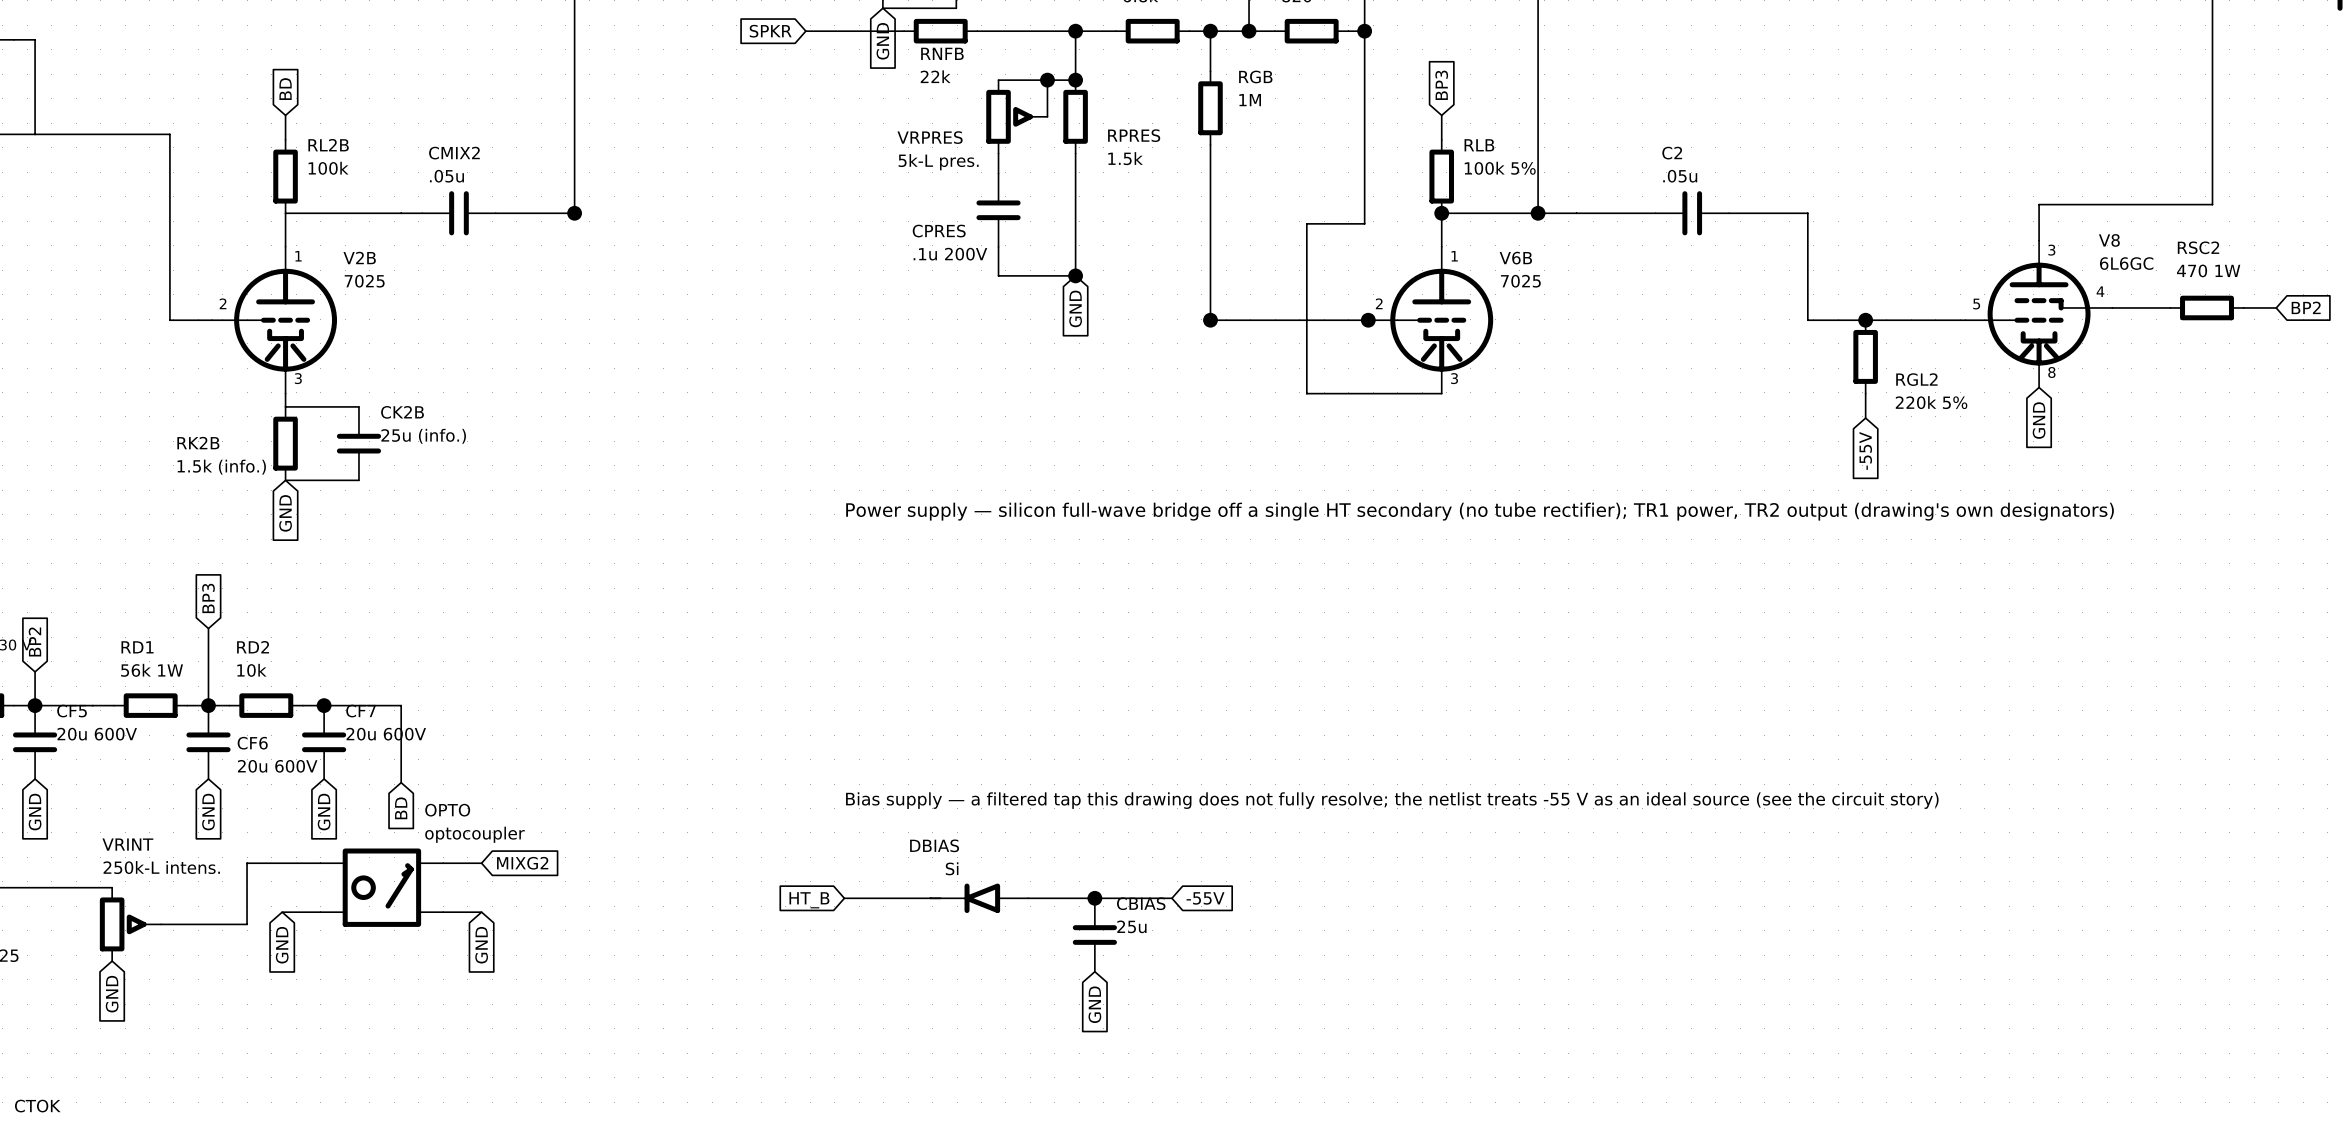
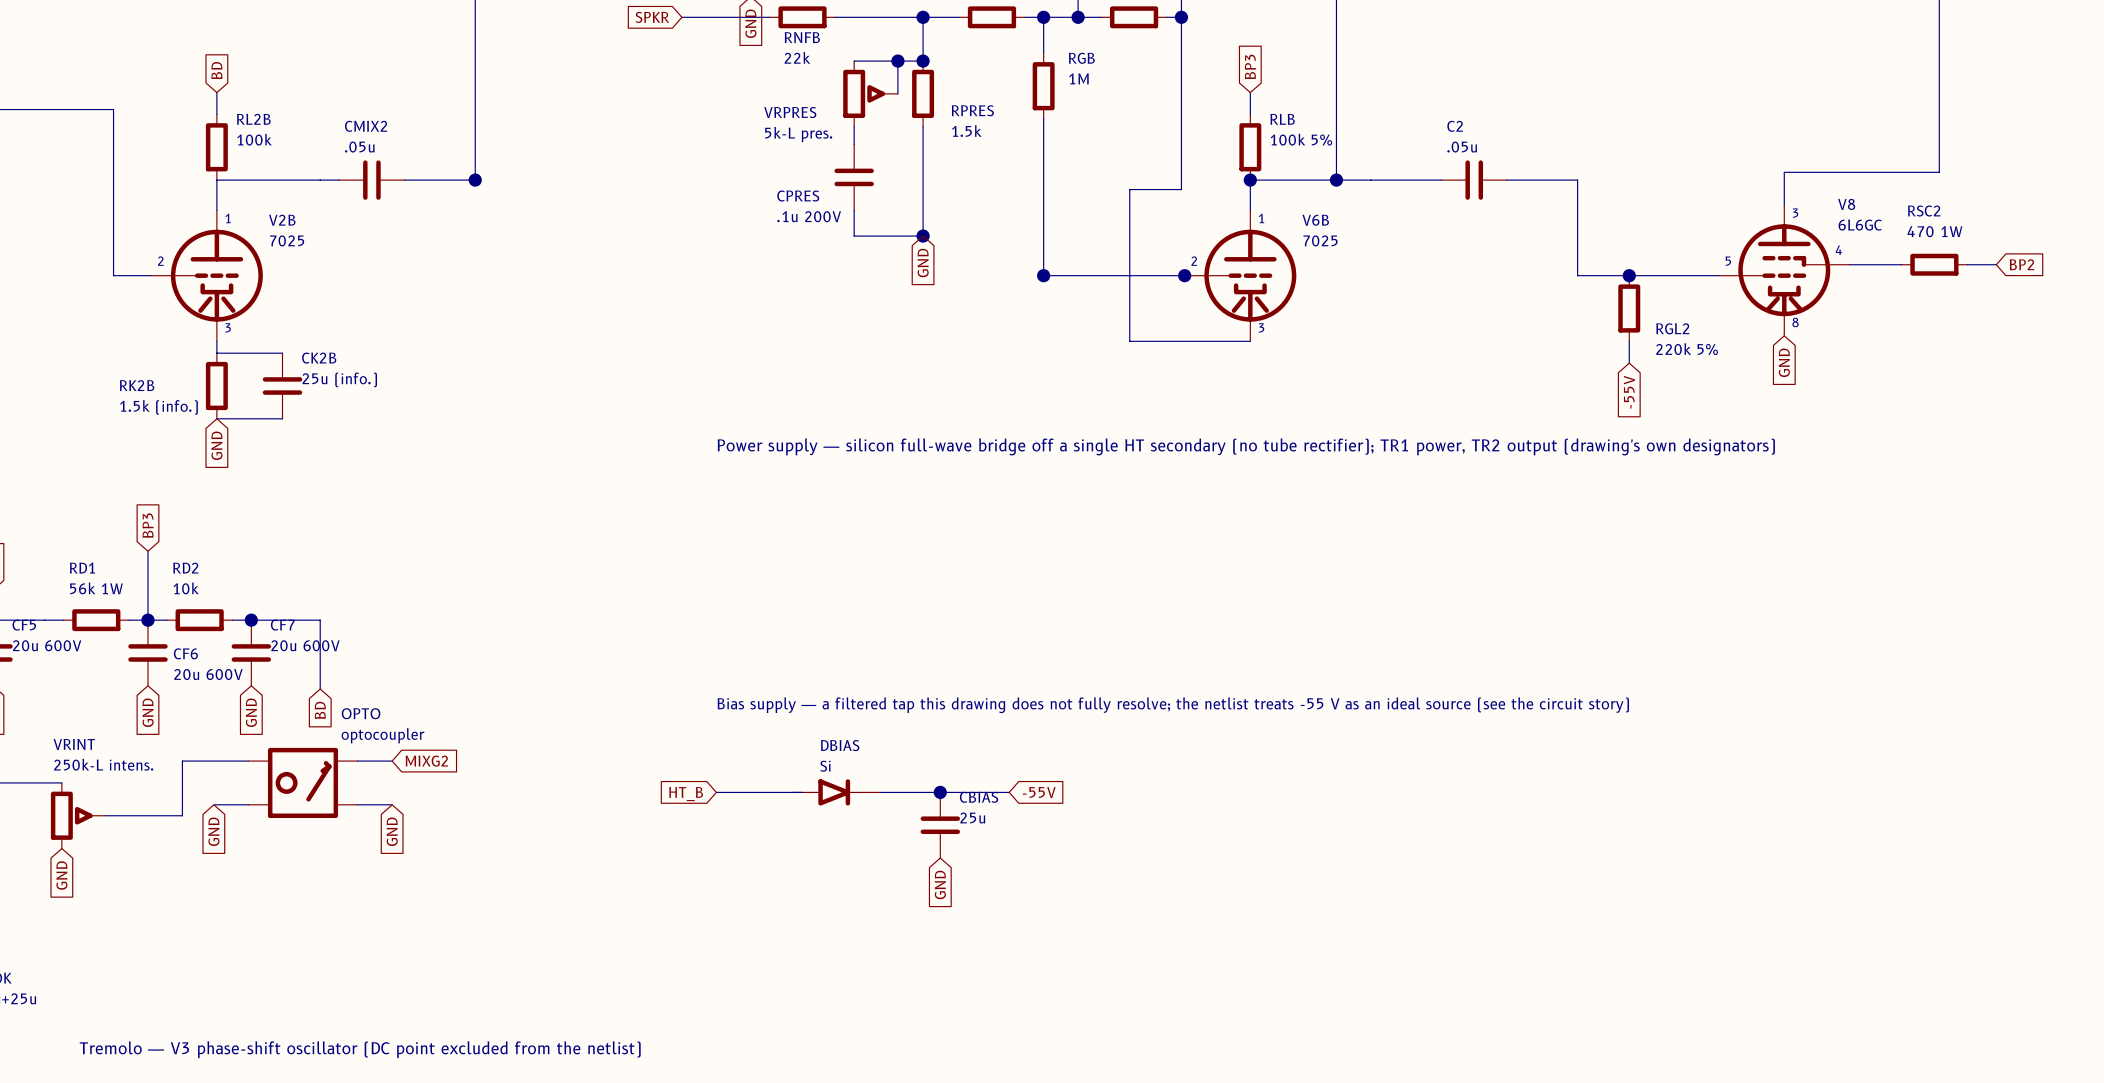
DBIAS name position: DBIAS (934, 845) -> DBIAS (840, 745)
DBIAS value position: Si (952, 868) -> Si (825, 766)
DBIAS rotation: 0° (982, 898) -> 180° (834, 792)

